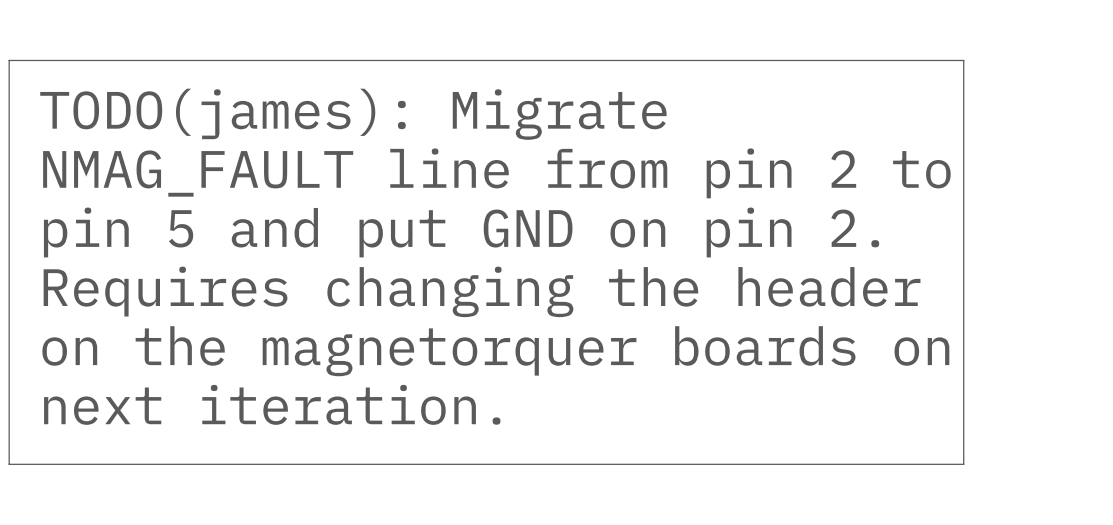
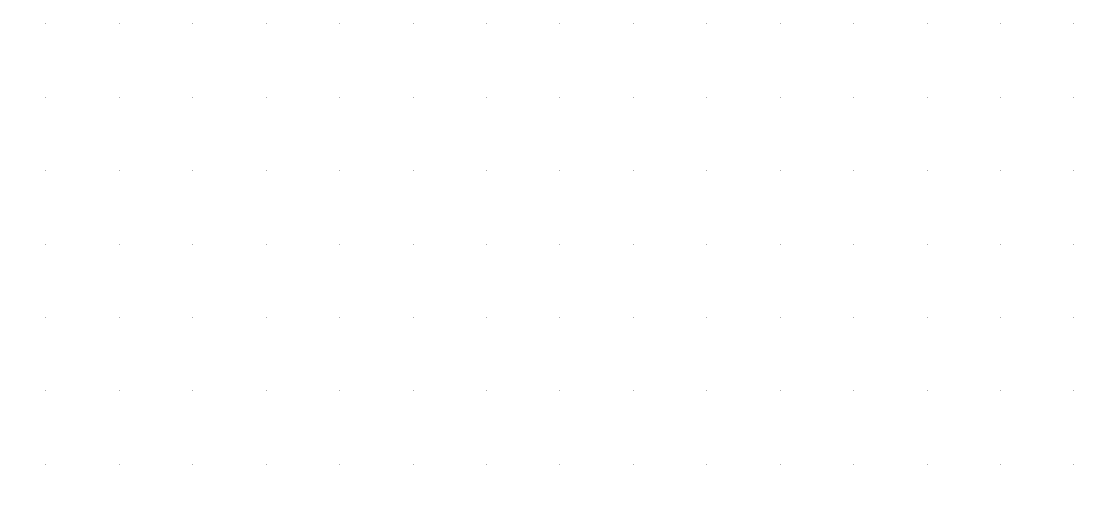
line: (9, 60) (963, 60) (963, 464) (9, 464) (9, 60) -> none
text: TODO(james): Migrate (353, 114) -> none
text: NMAG_FAULT line from pin 2 to (496, 173) -> none
text: pin 5 and put GND on pin 2. (461, 232) -> none
text: Requires changing the header (482, 291) -> none
text: on the magnetorquer boards on (495, 351) -> none
text: next iteration. (272, 404) -> none

